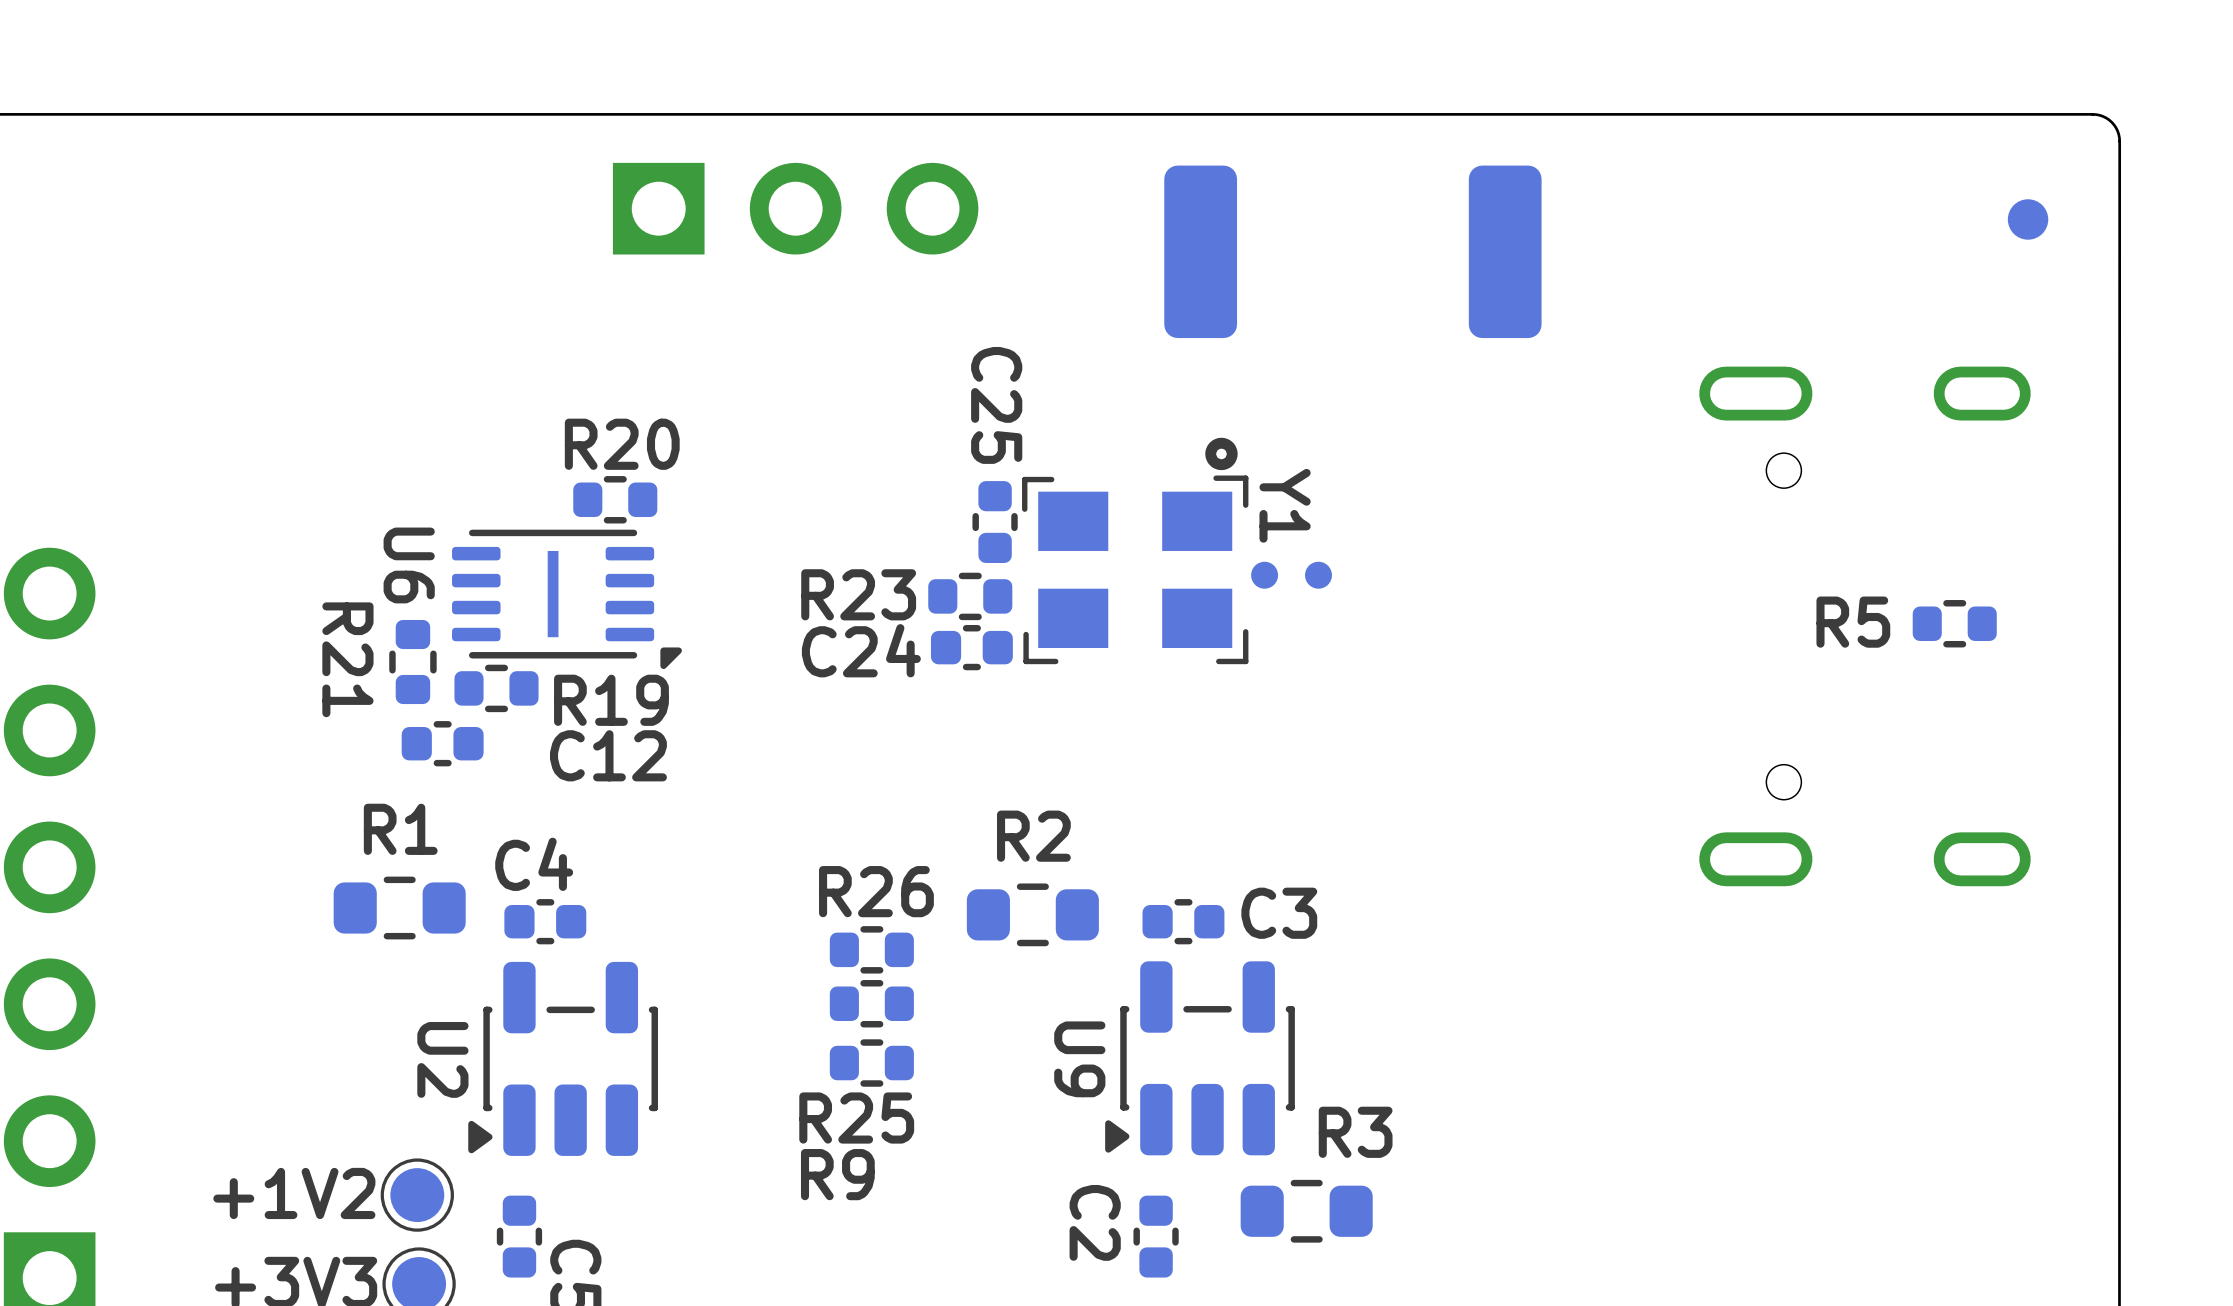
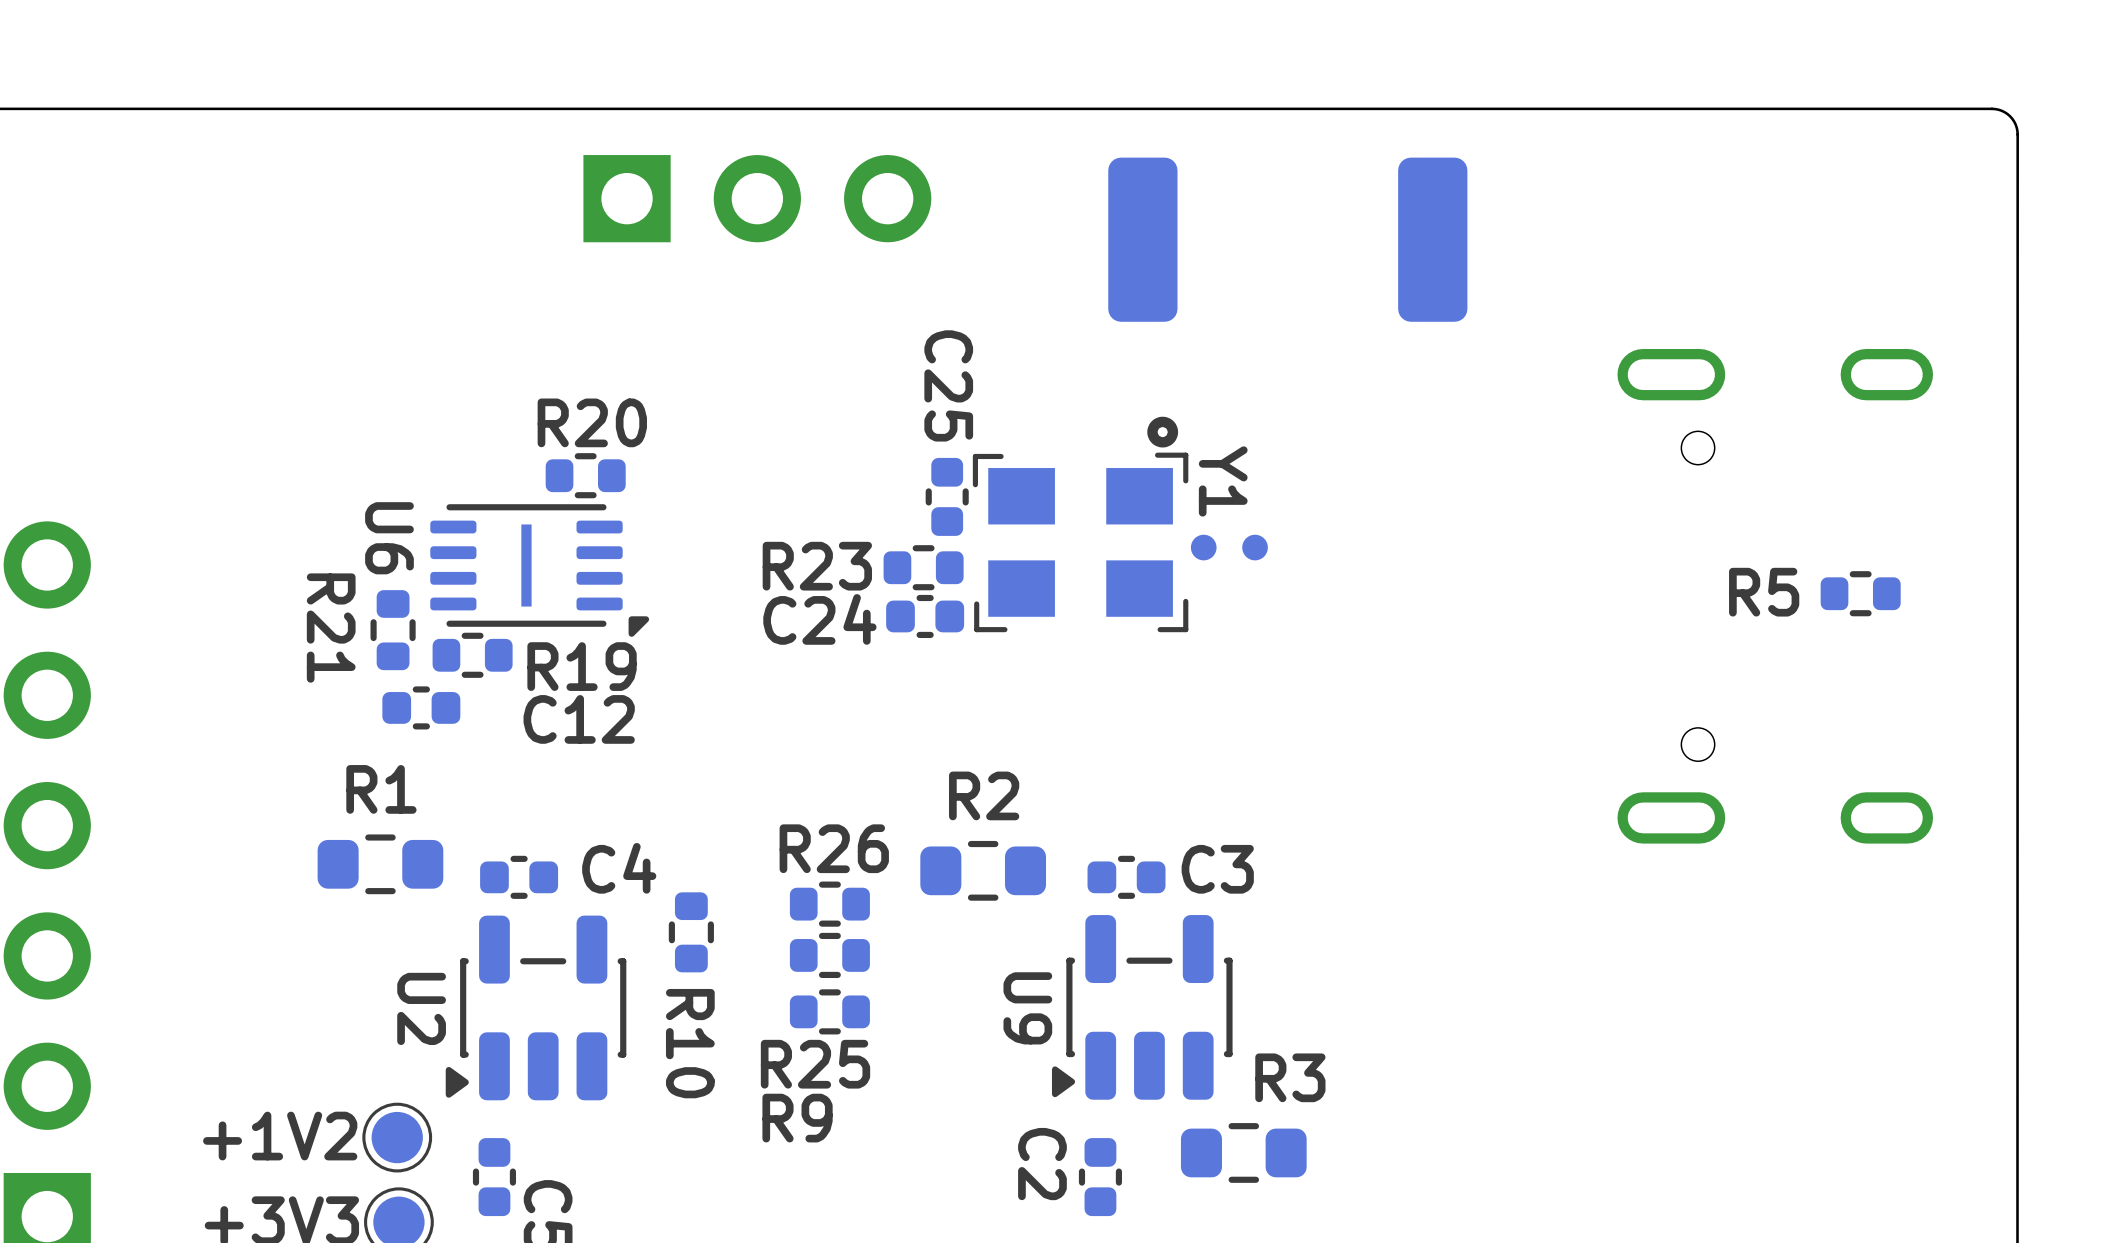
part: (2028, 219) -> none
C4 name position: C4 (534, 864) -> C4 (619, 868)
R10: none -> (691, 932)

